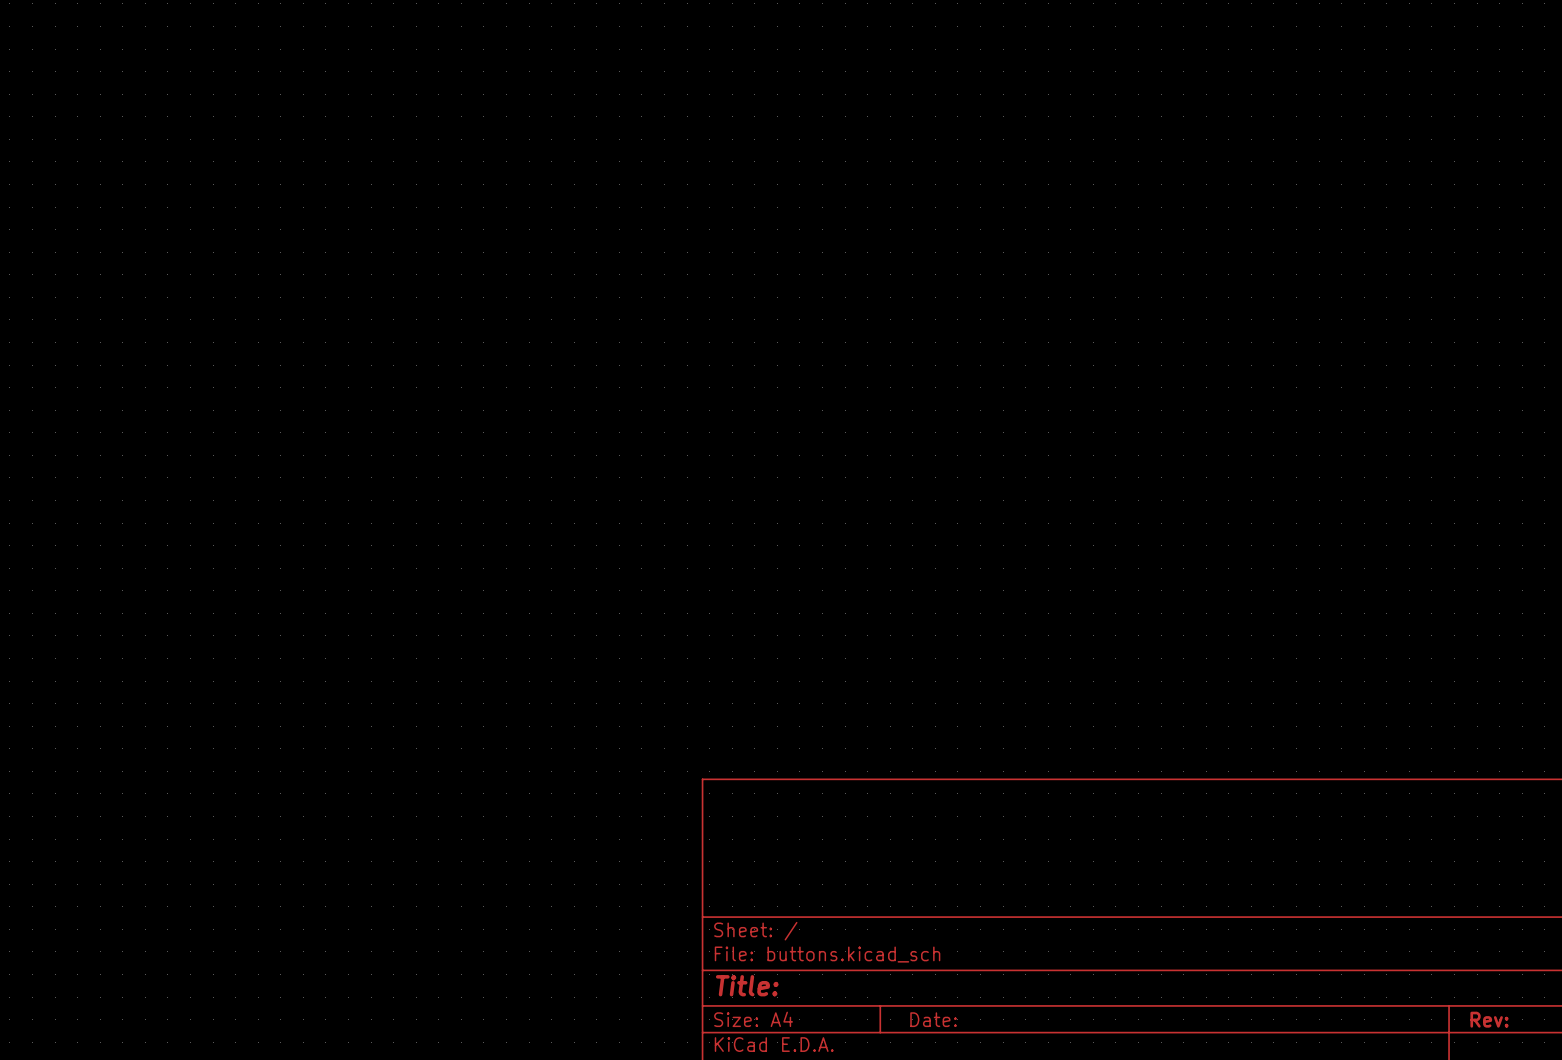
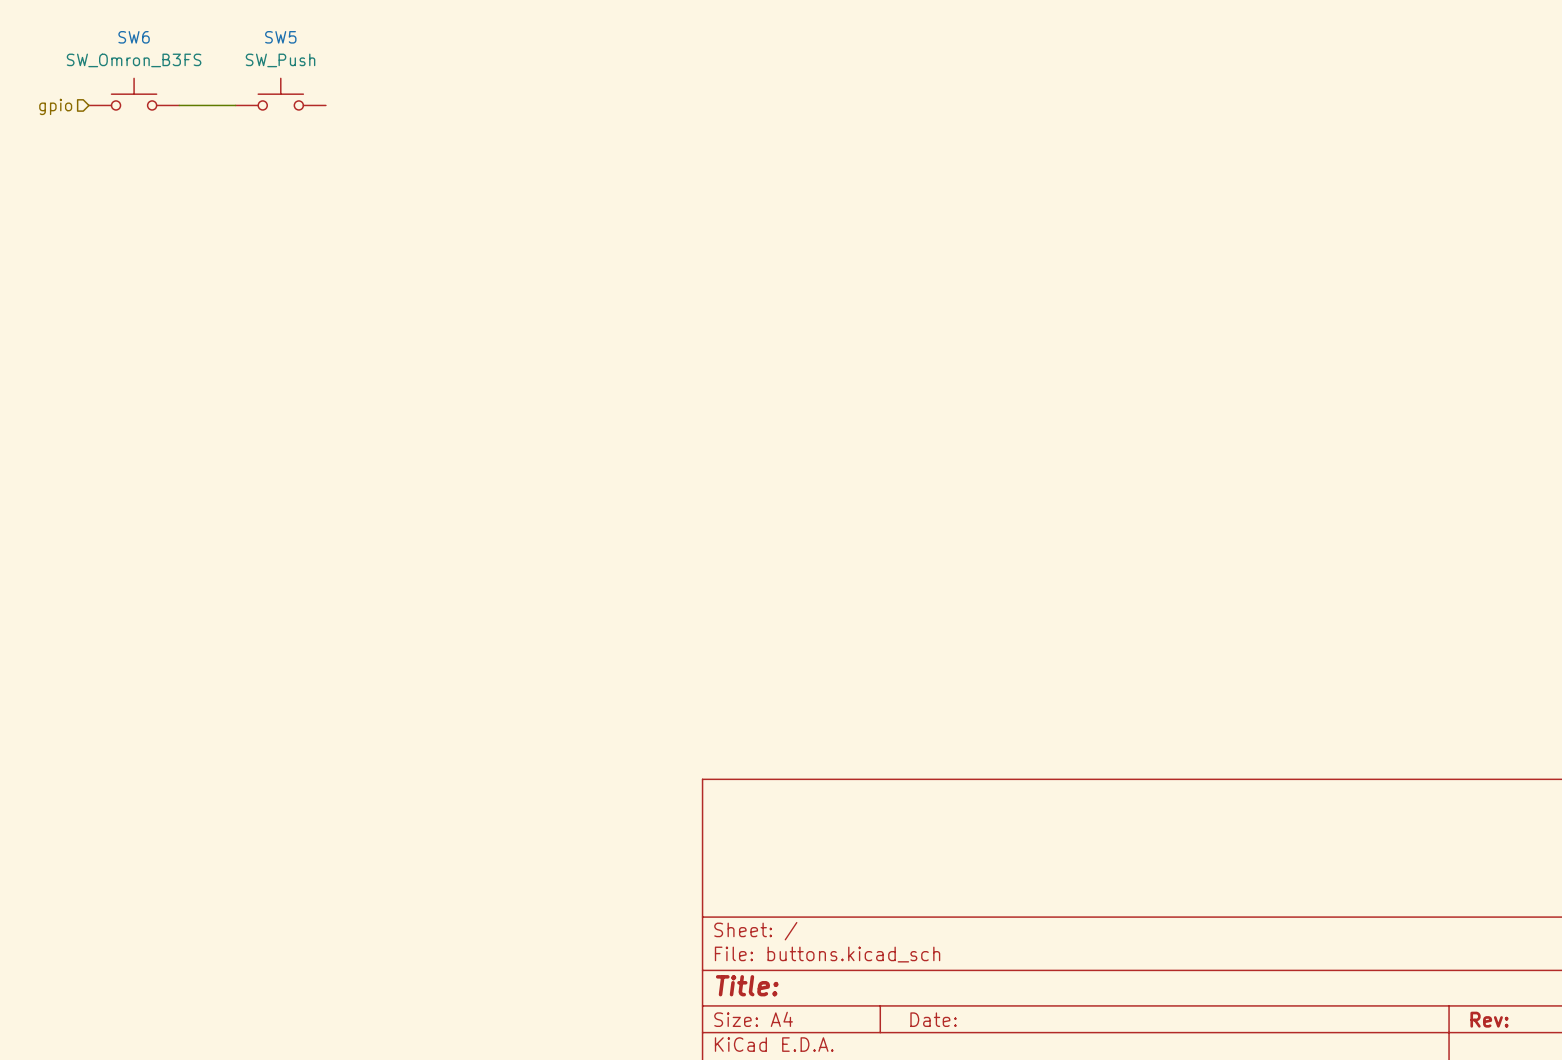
SW6: none -> SW_Omron_B3FS (134, 94)
SW5: none -> SW_Push (280, 94)
wire: none -> (179, 105) (235, 105)
hierarchical label: none -> gpio (55, 106)

